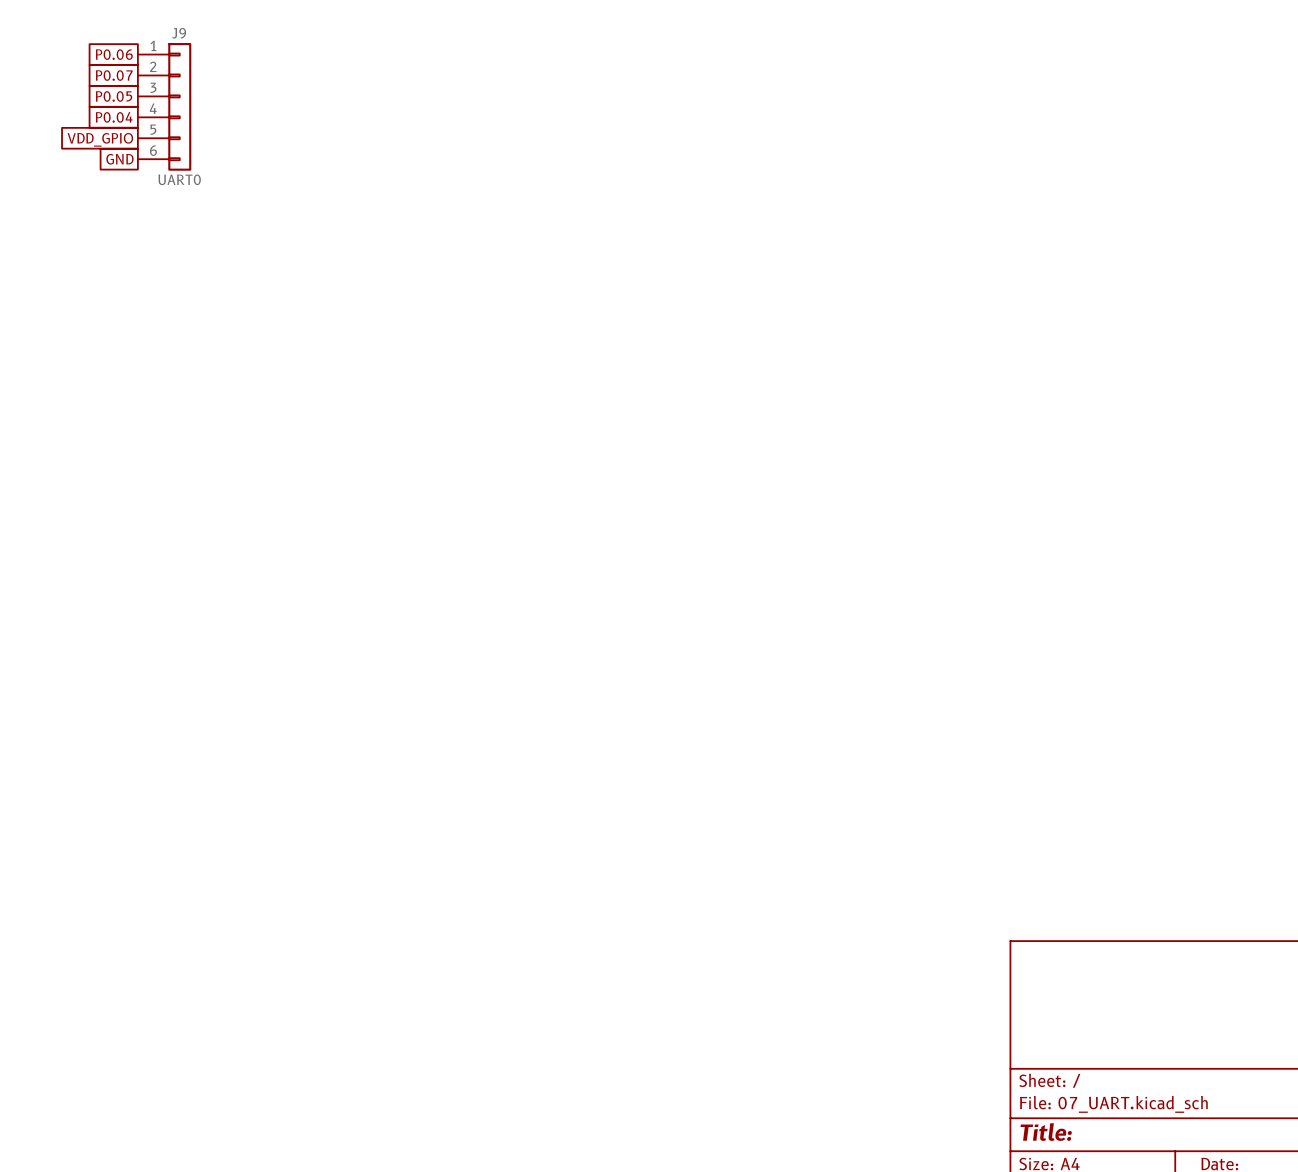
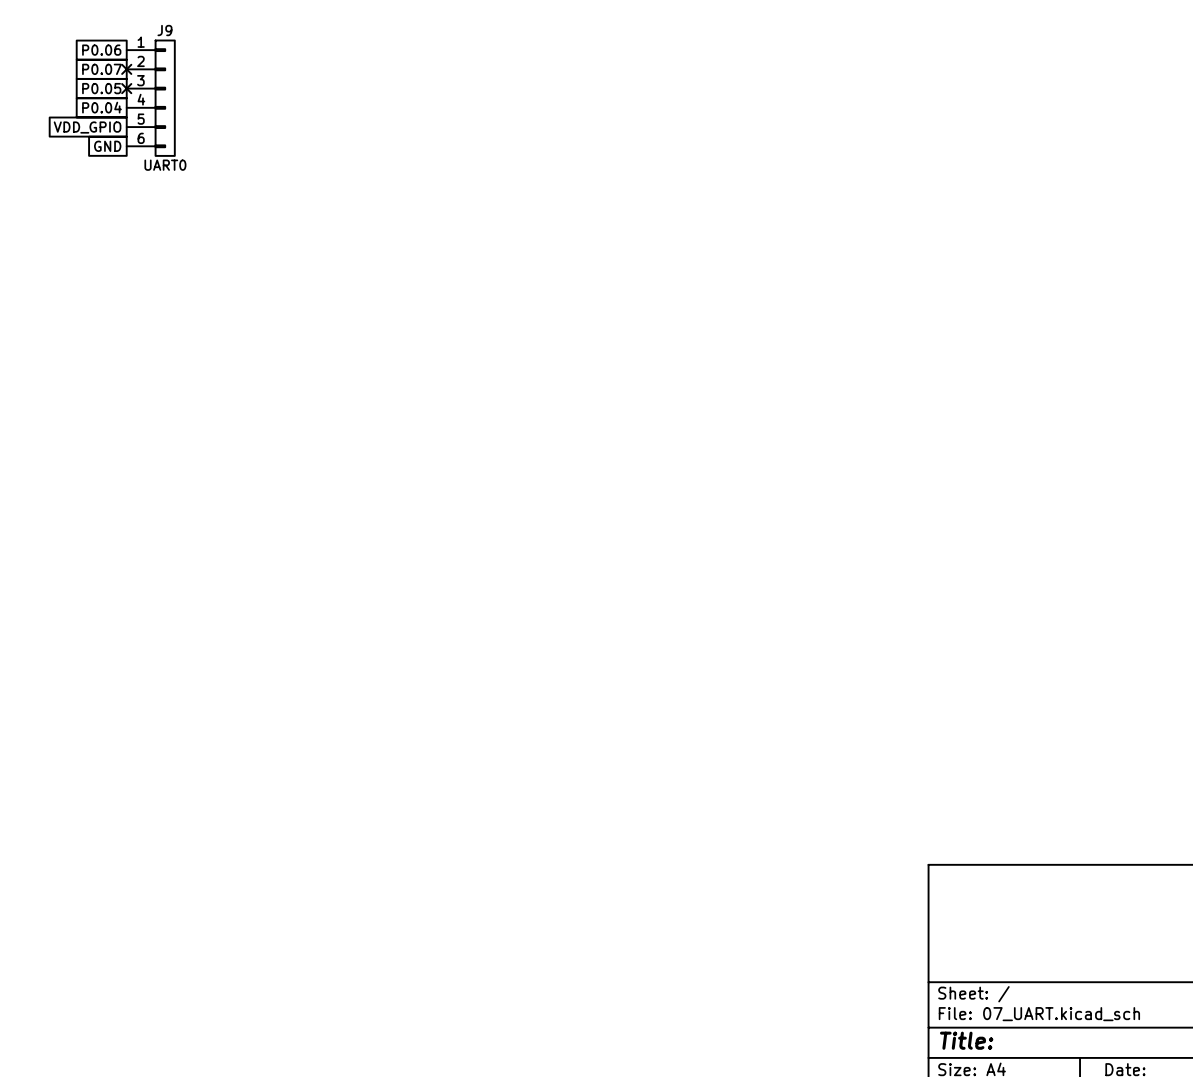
no-connect mark: none -> (126, 69)
no-connect mark: none -> (126, 88)

